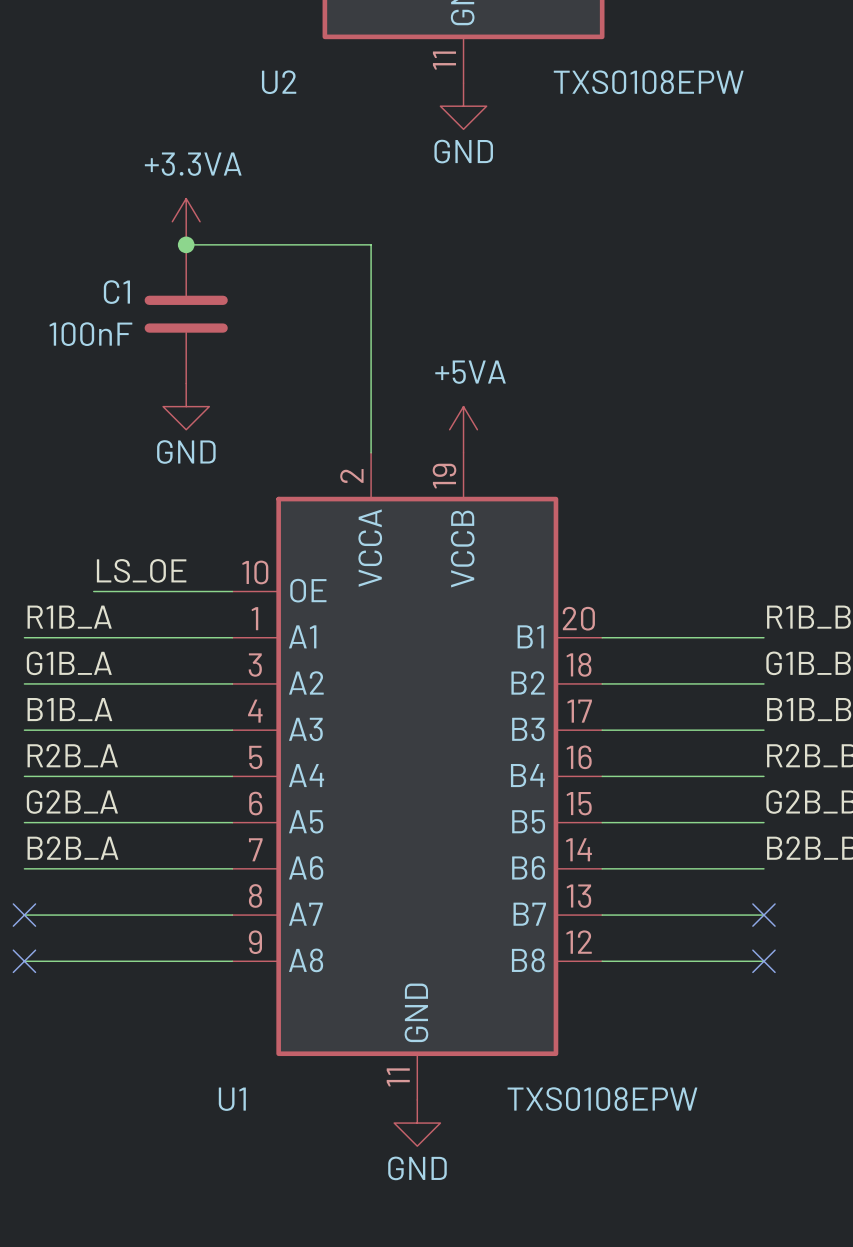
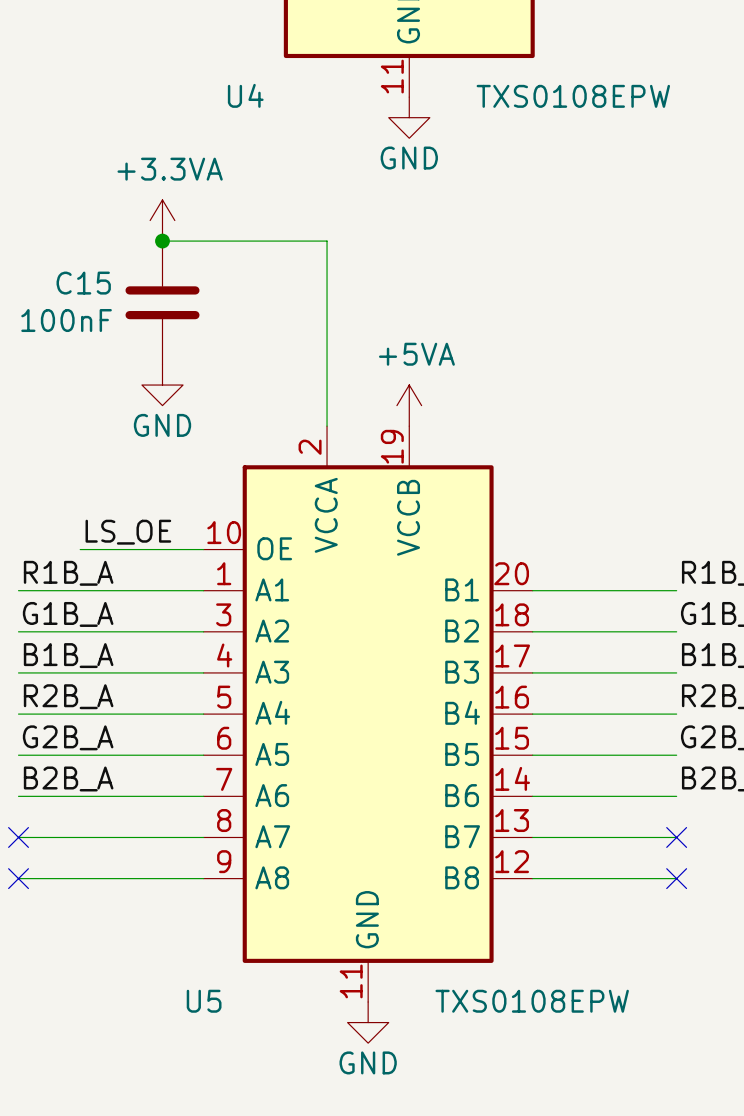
U2 name: U2 (279, 82) -> U4 (245, 95)
C1 name: C1 (116, 292) -> C15 (83, 283)
U1 name: U1 (232, 1099) -> U5 (204, 1001)

